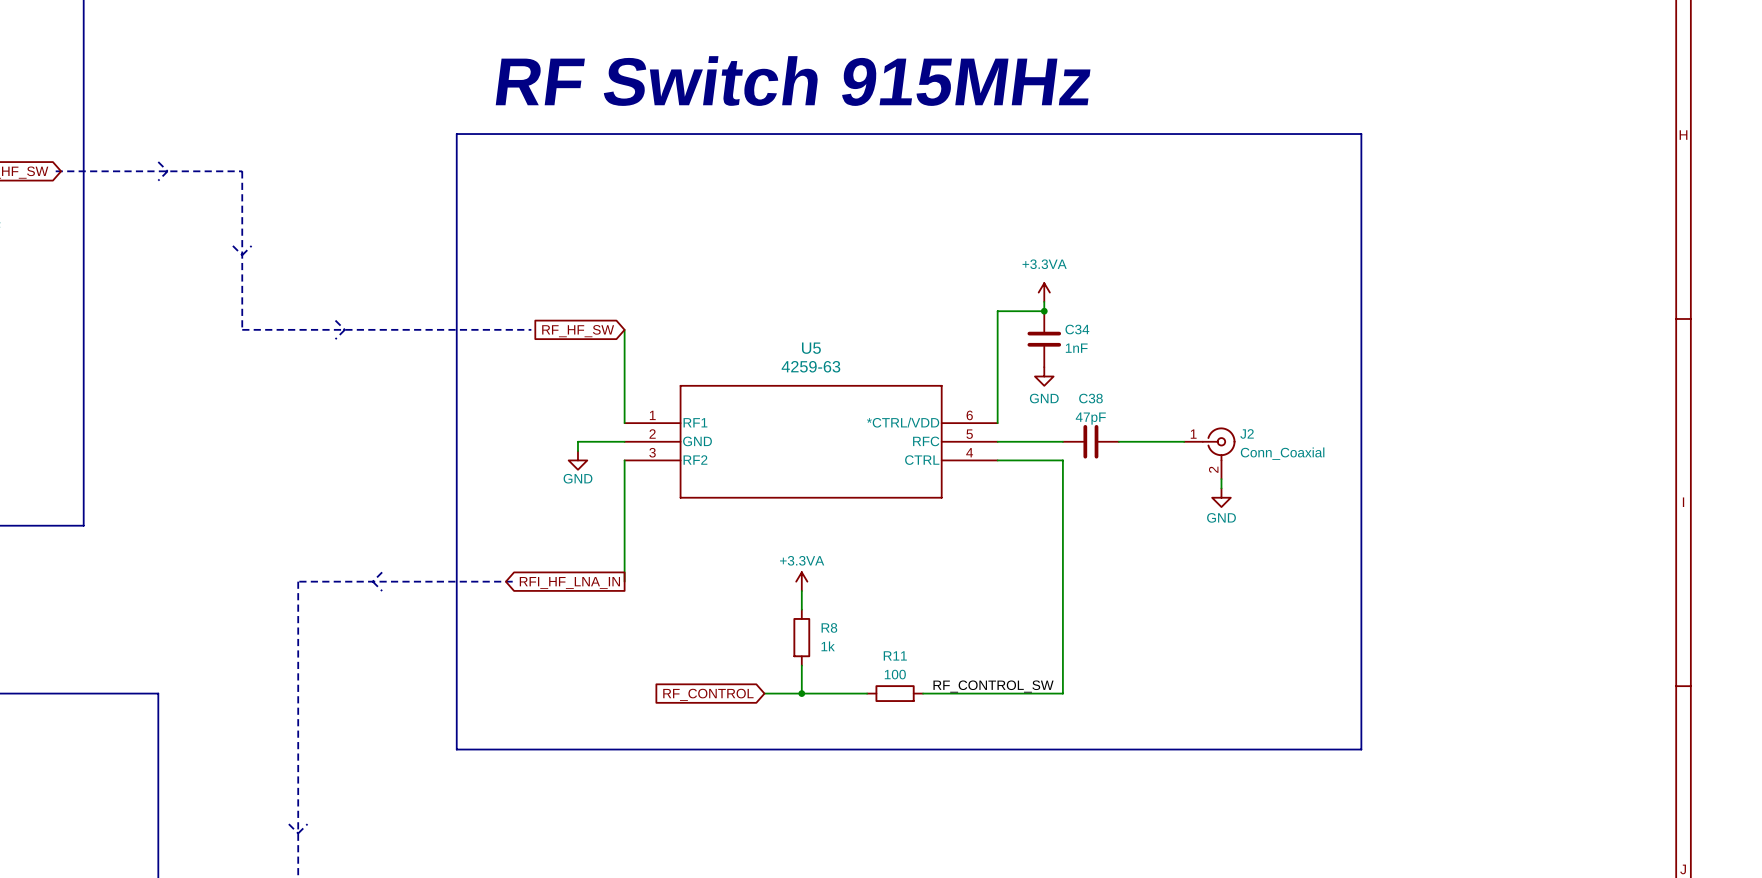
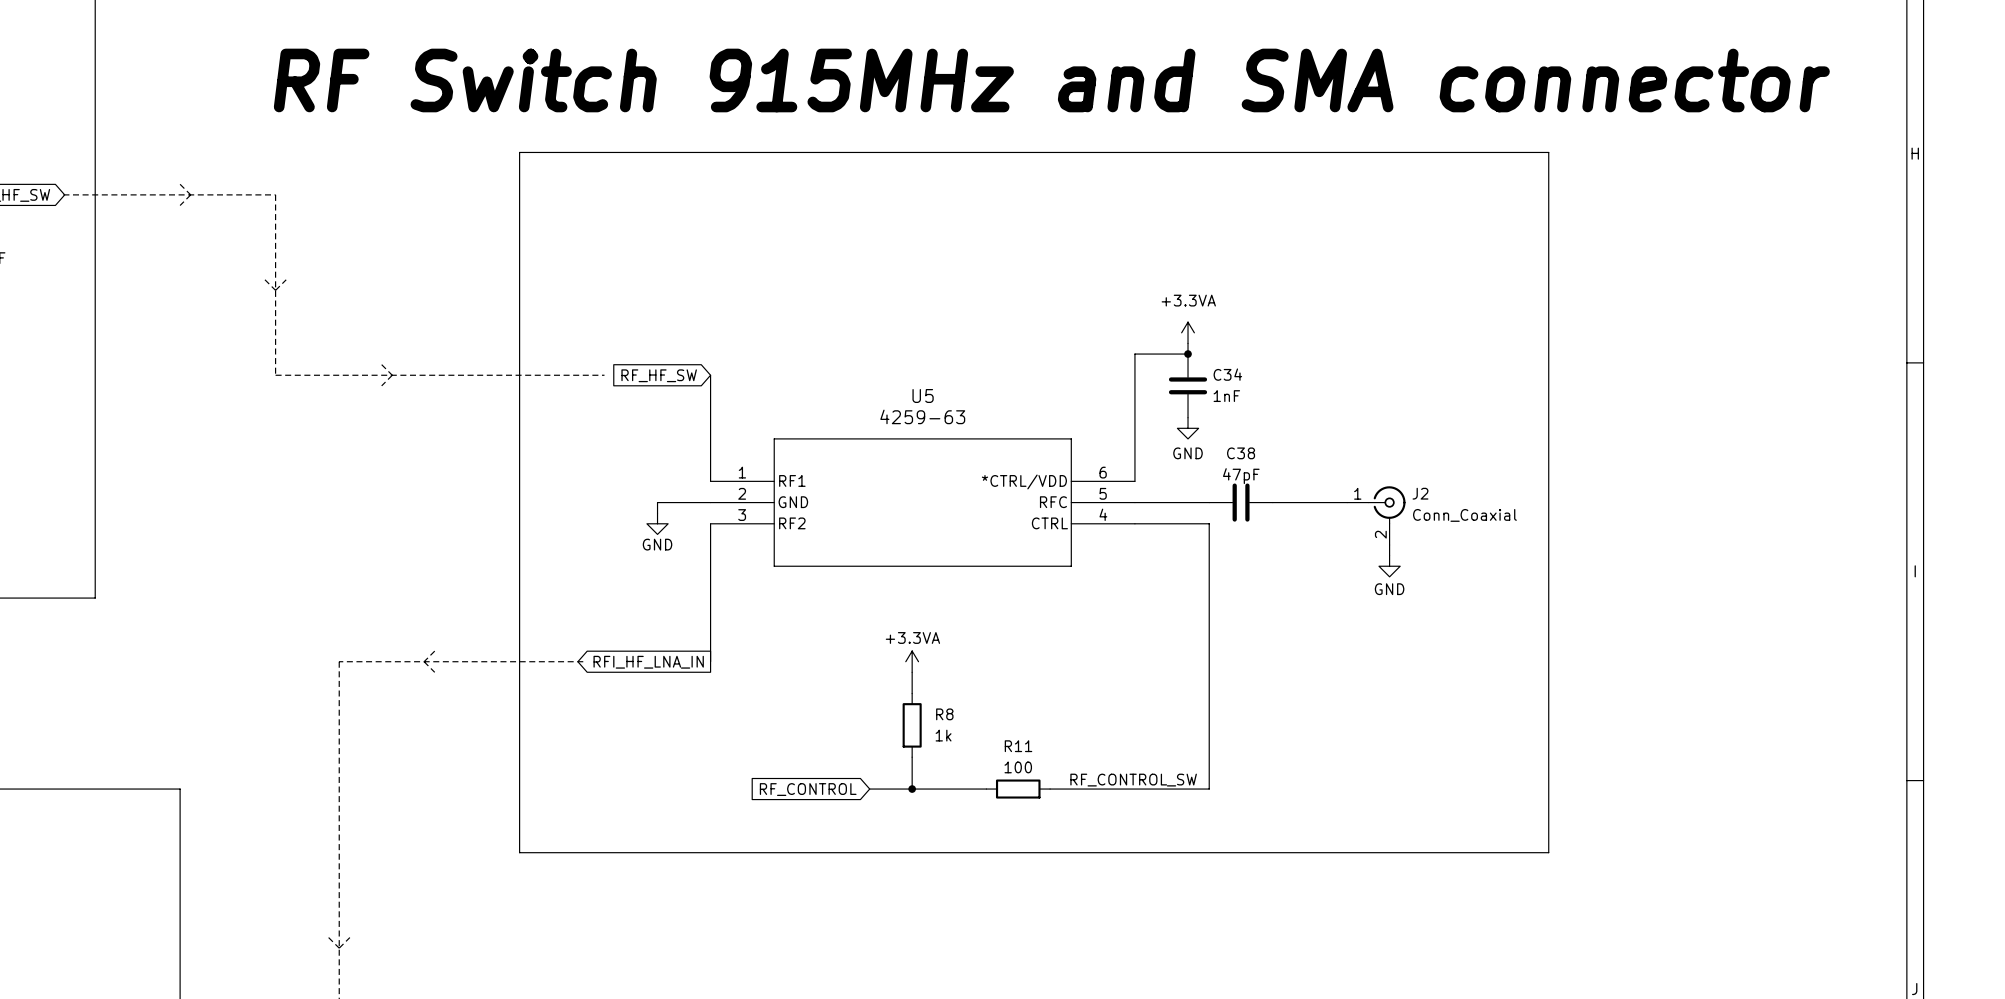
text: RF Switch 915MHz (793, 81) -> RF Switch 915MHz and SMA connector (1051, 80)

